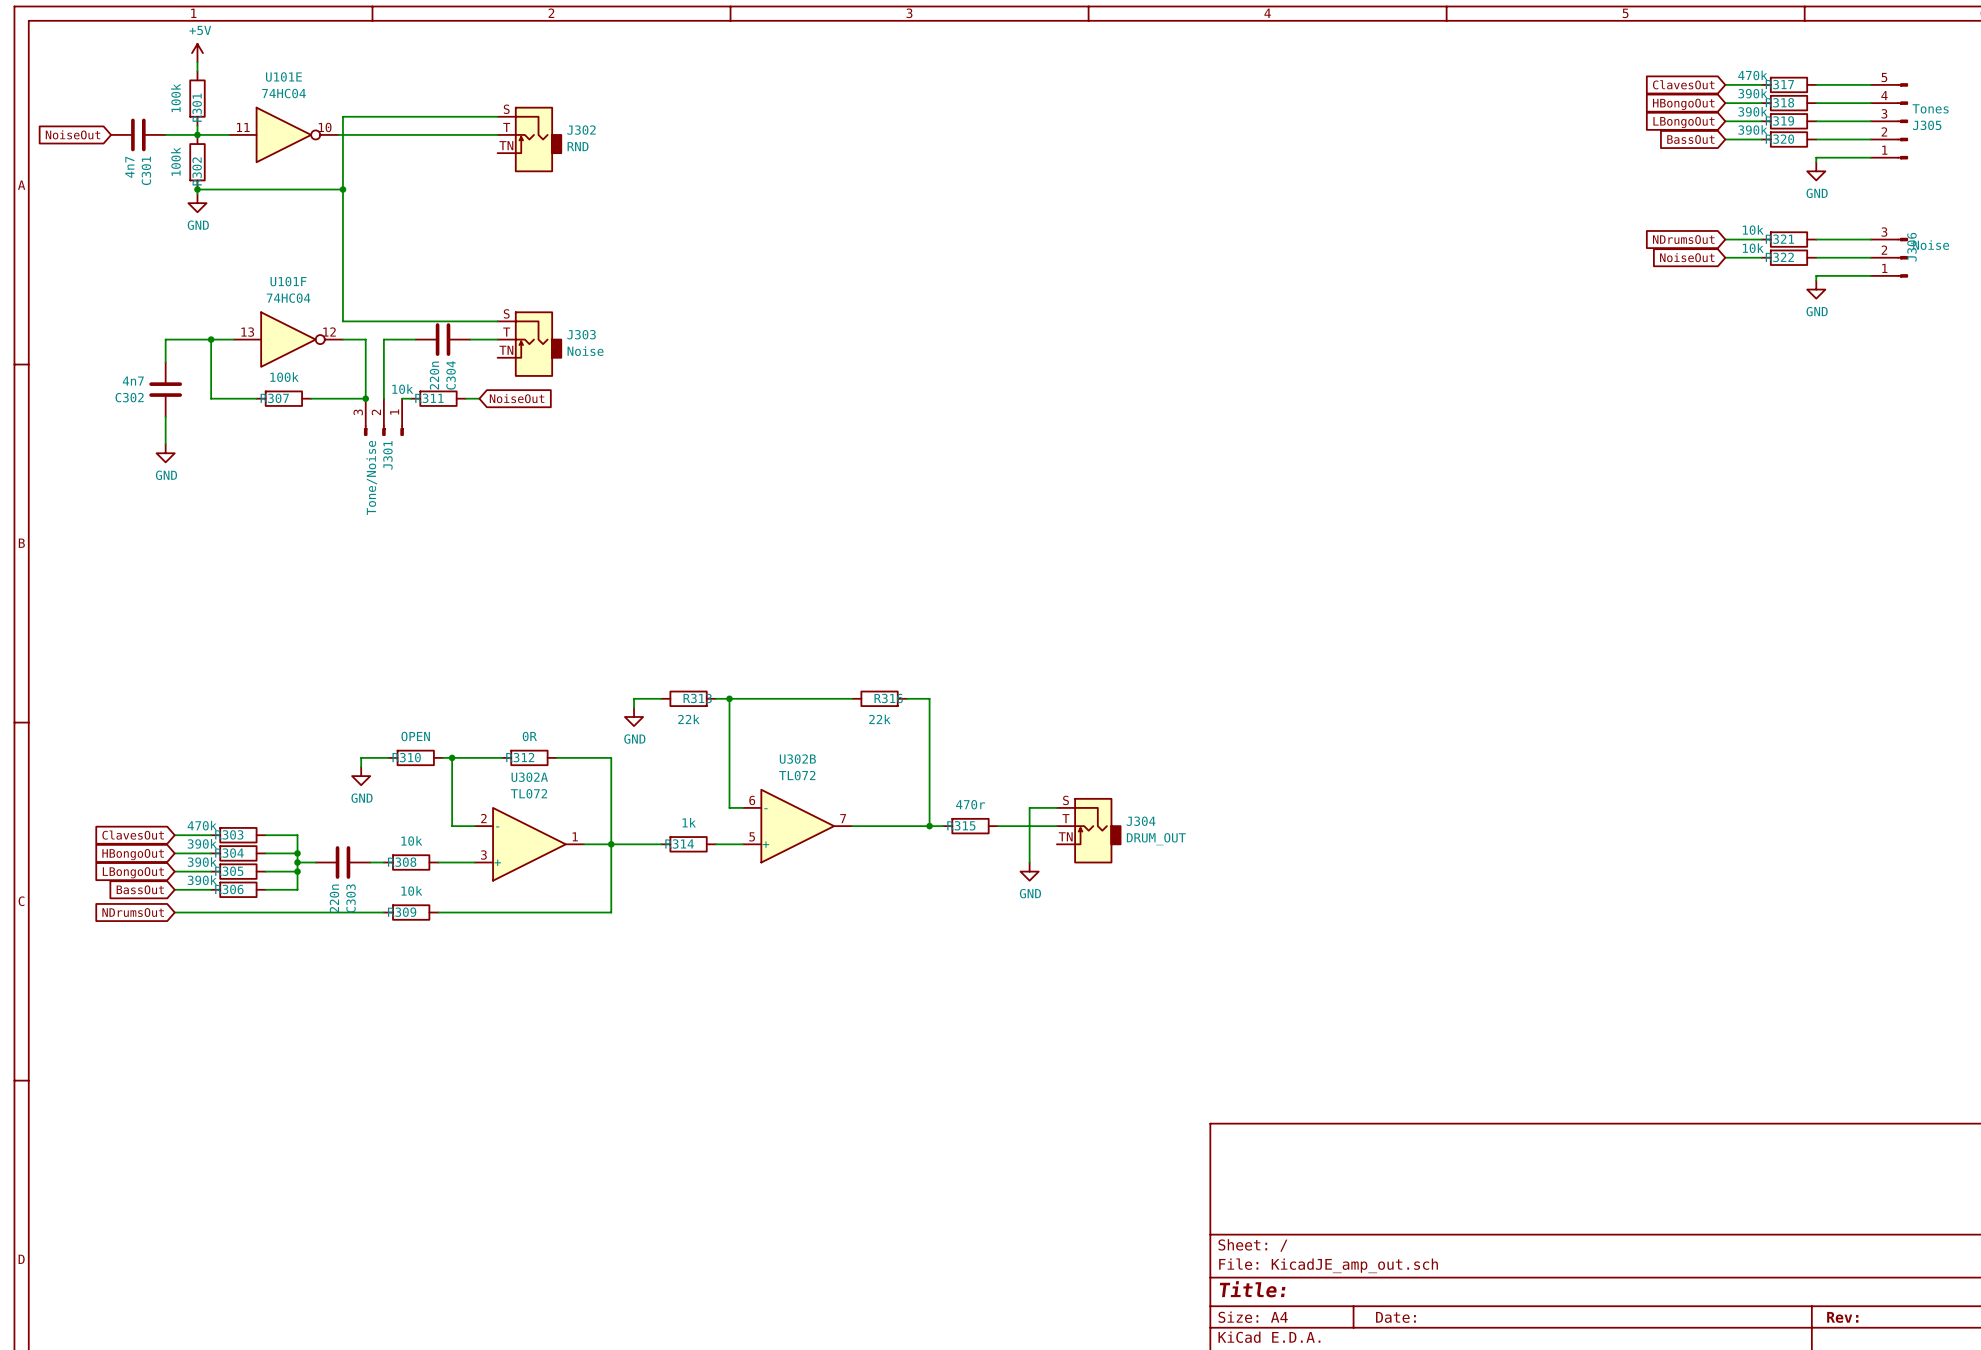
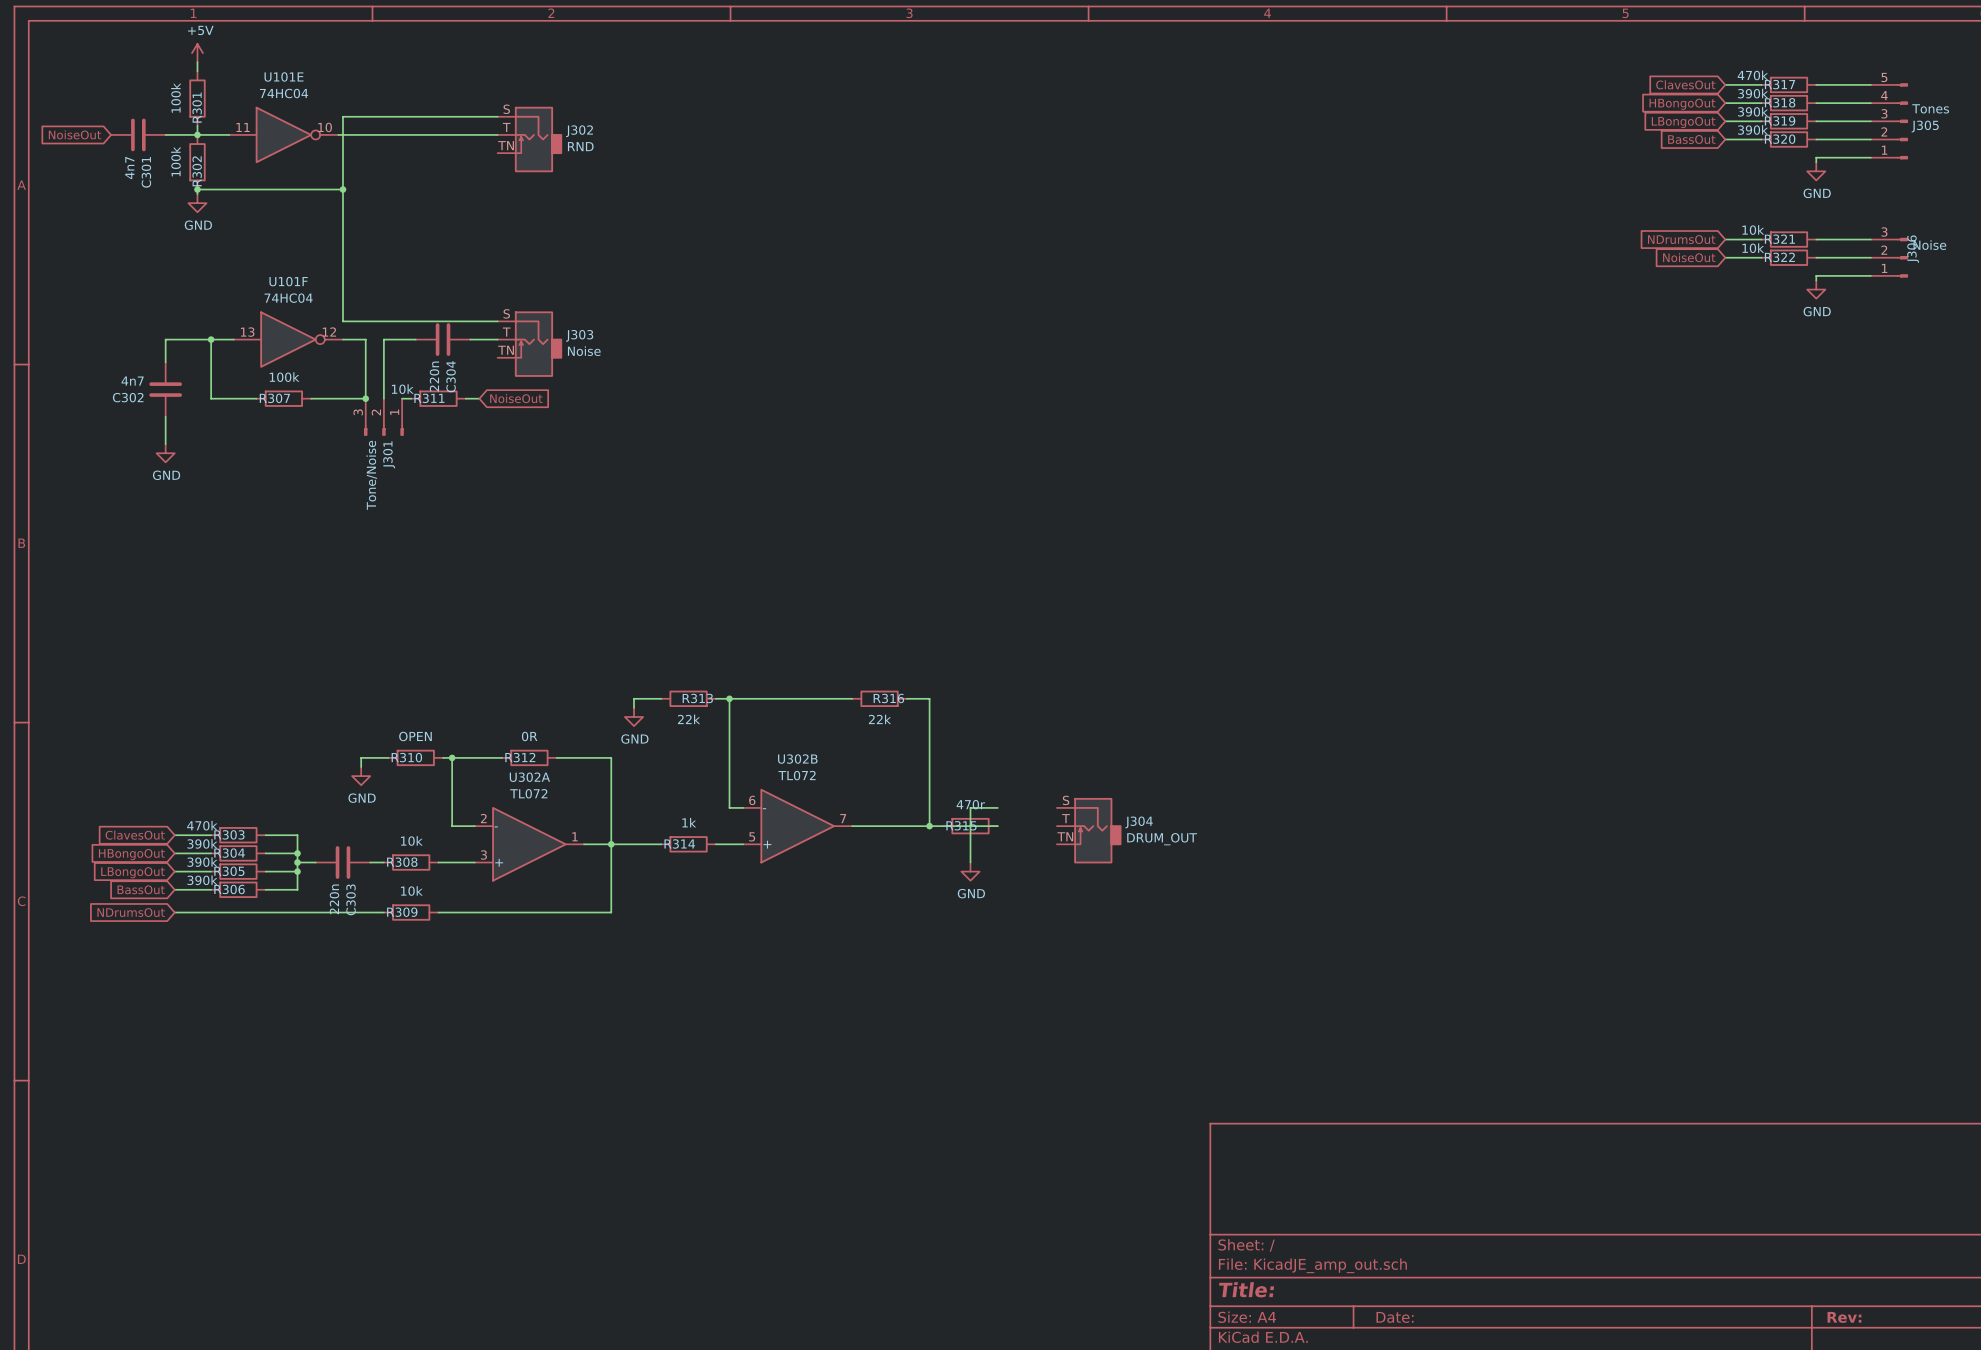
wire: (1056, 807) (1029, 807) (1029, 862) -> (997, 807) (970, 807) (970, 862)
wire: (997, 826) (1056, 826) -> (997, 826) (943, 826)
power symbol position: GND (1029, 871) -> GND (970, 871)

